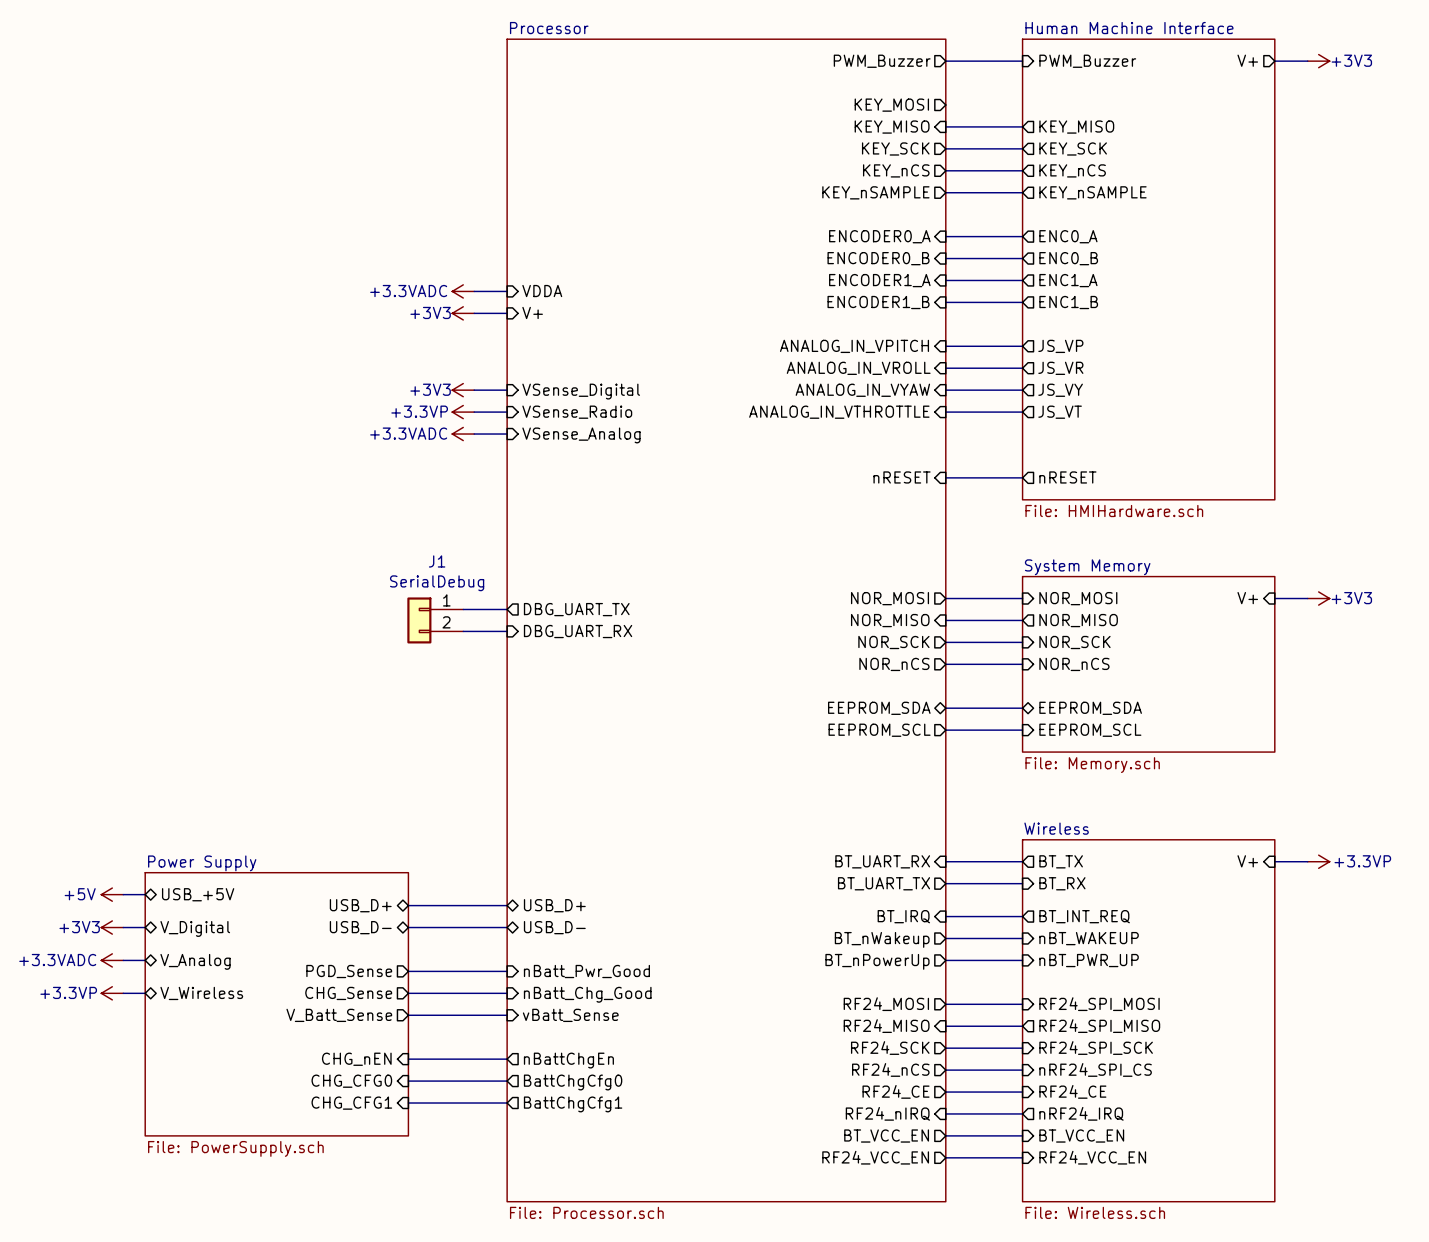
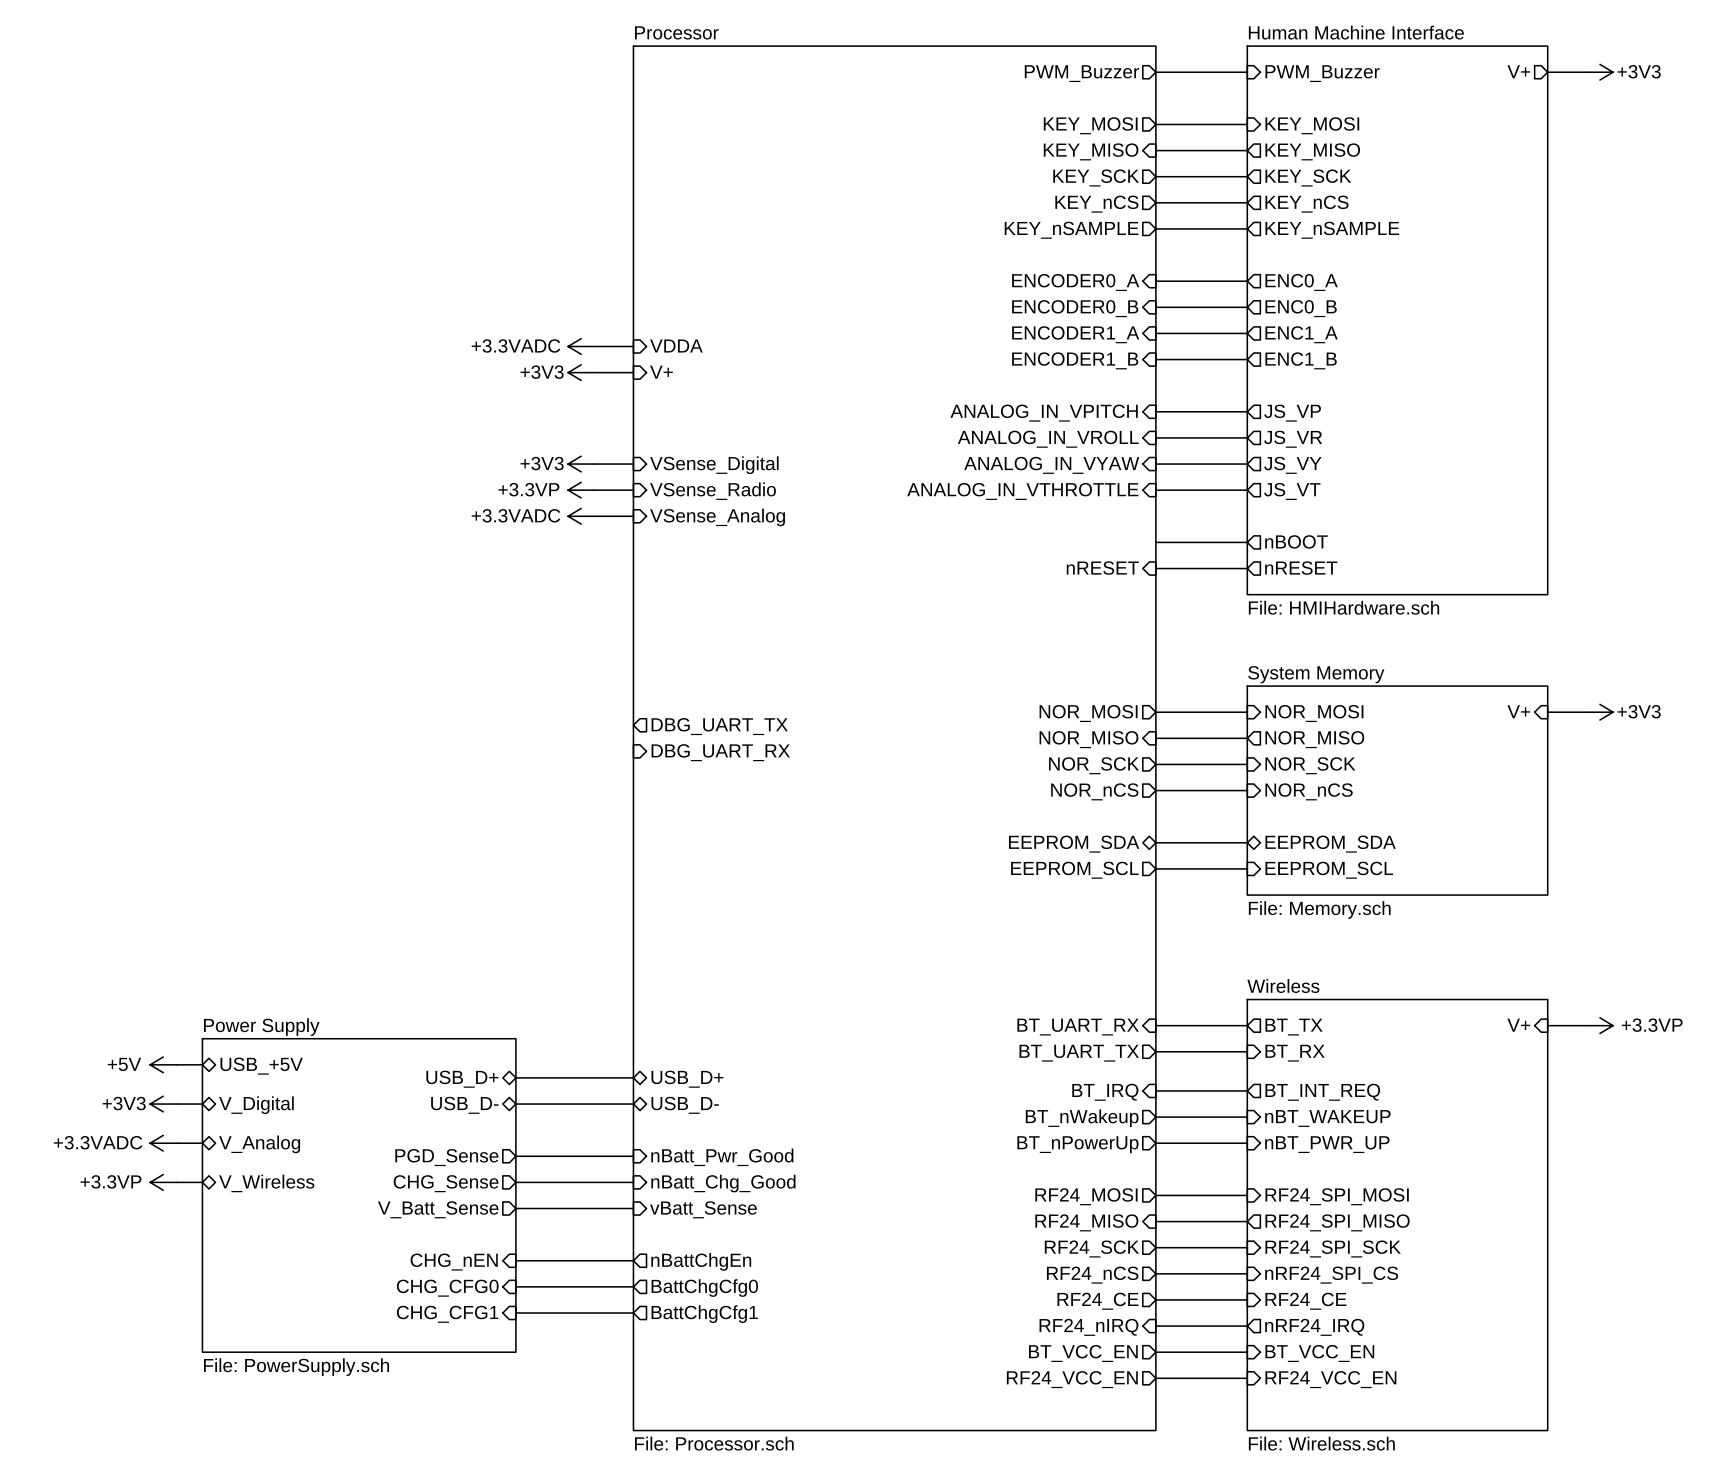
wire: none -> (1155, 124) (1247, 124)
sheet pin: none -> KEY_MOSI (1312, 125)
wire: none -> (1155, 542) (1247, 542)
sheet pin: none -> nBOOT (1296, 541)
wire: (463, 609) (507, 609) -> none
J1: SerialDebug (435, 620) -> none
wire: (463, 631) (507, 631) -> none

